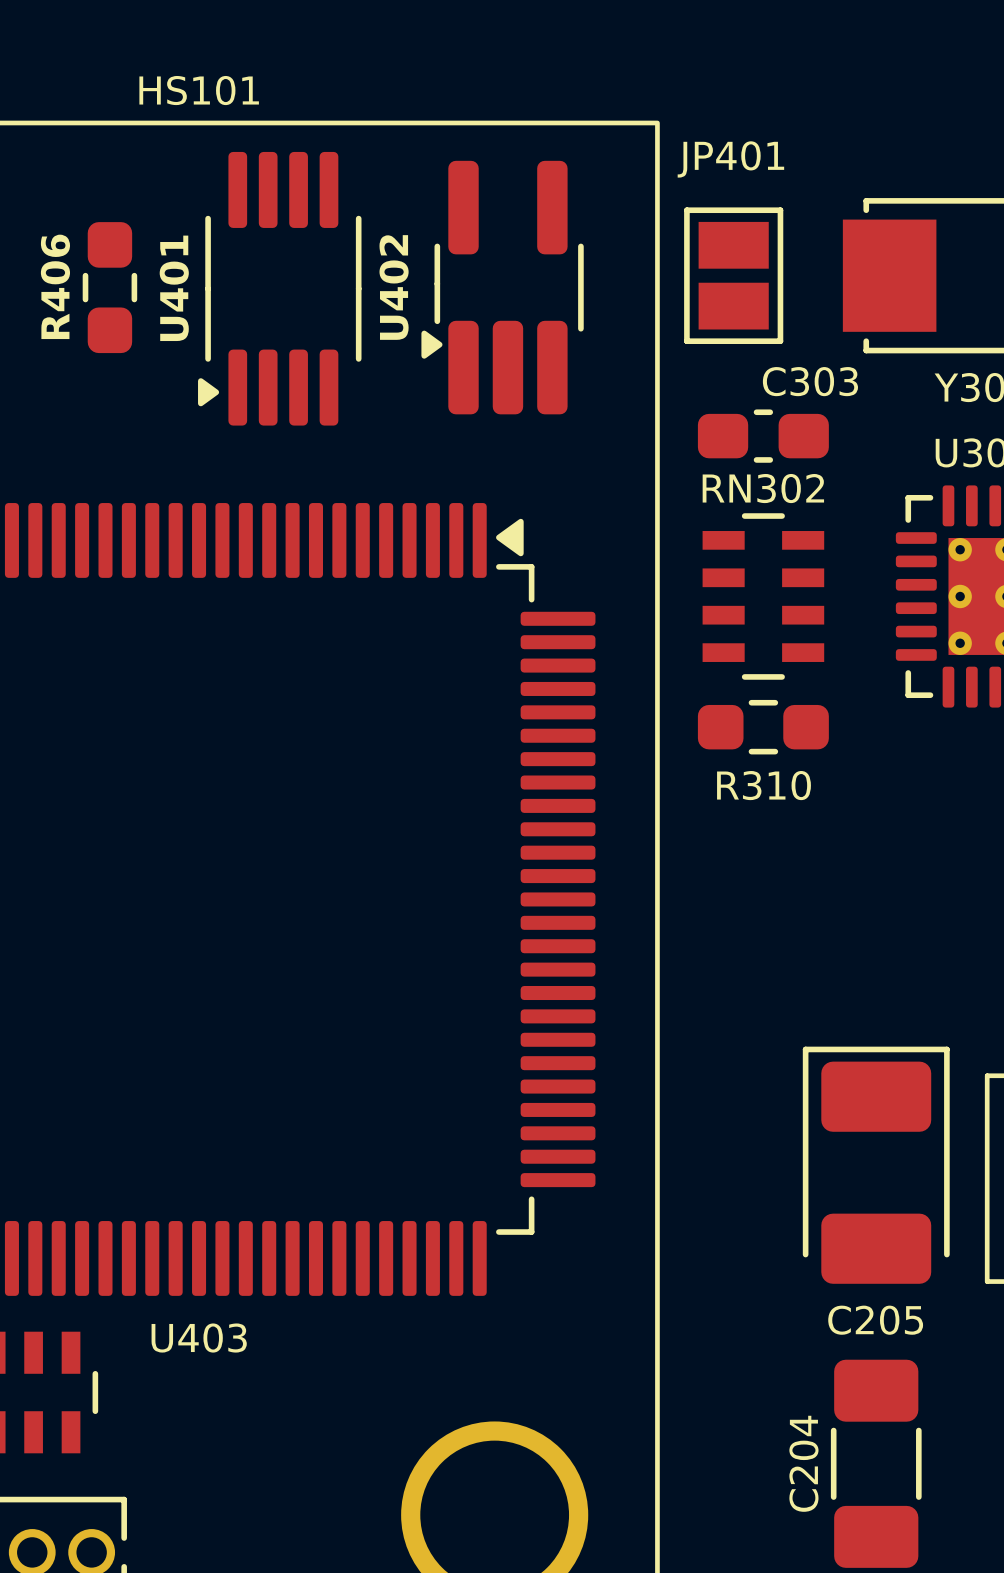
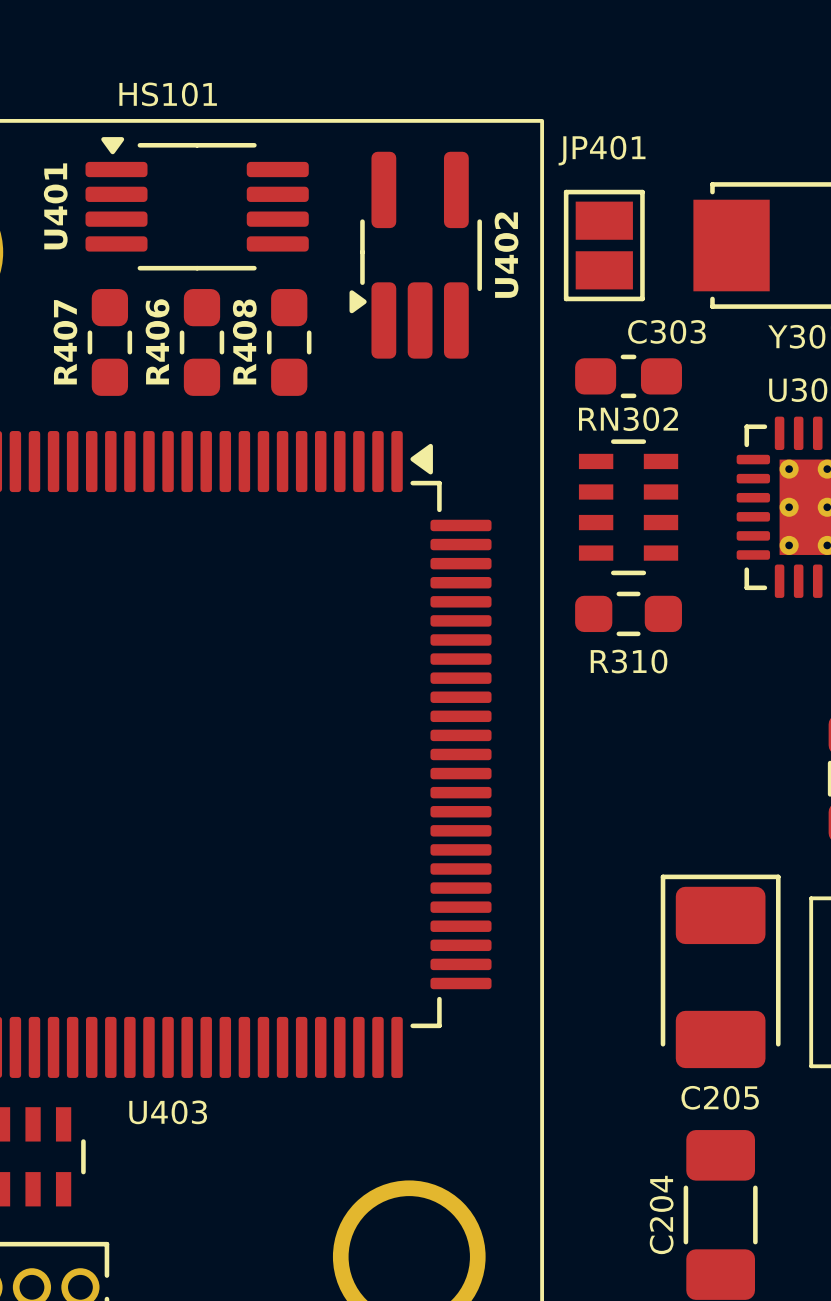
R406 position: (109, 287) -> (201, 342)
U402 name position: U402 (394, 287) -> U402 (506, 255)
U401 rotation: 0° (279, 288) -> 90° clockwise (197, 203)
R407: none -> (109, 342)
R408: none -> (289, 342)

